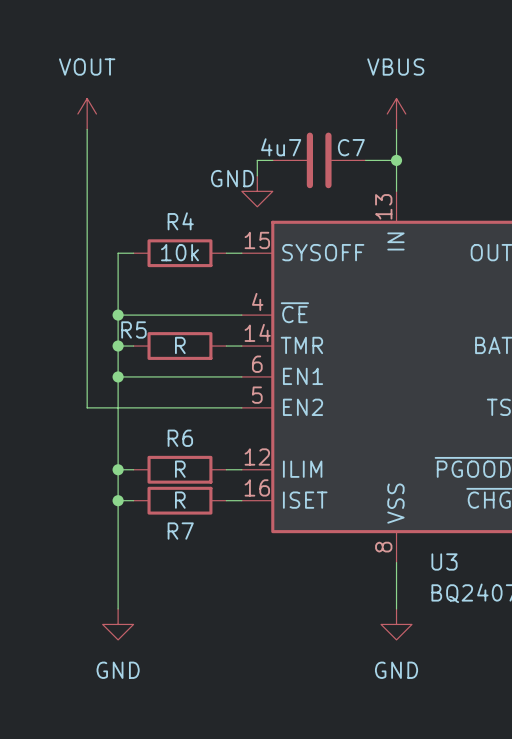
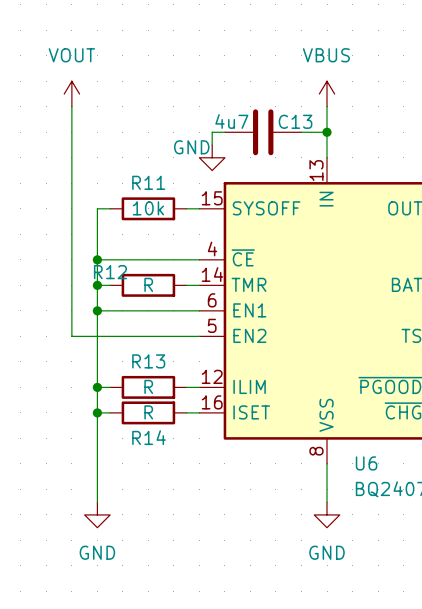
C7 name: C7 (351, 147) -> C13 (295, 121)
R4 name: R4 (180, 221) -> R11 (148, 182)
R5 name: R5 (133, 329) -> R12 (110, 272)
R6 name: R6 (180, 438) -> R13 (148, 361)
R7 name: R7 (180, 531) -> R14 (149, 437)
U3 name: U3 (444, 561) -> U6 (366, 463)

